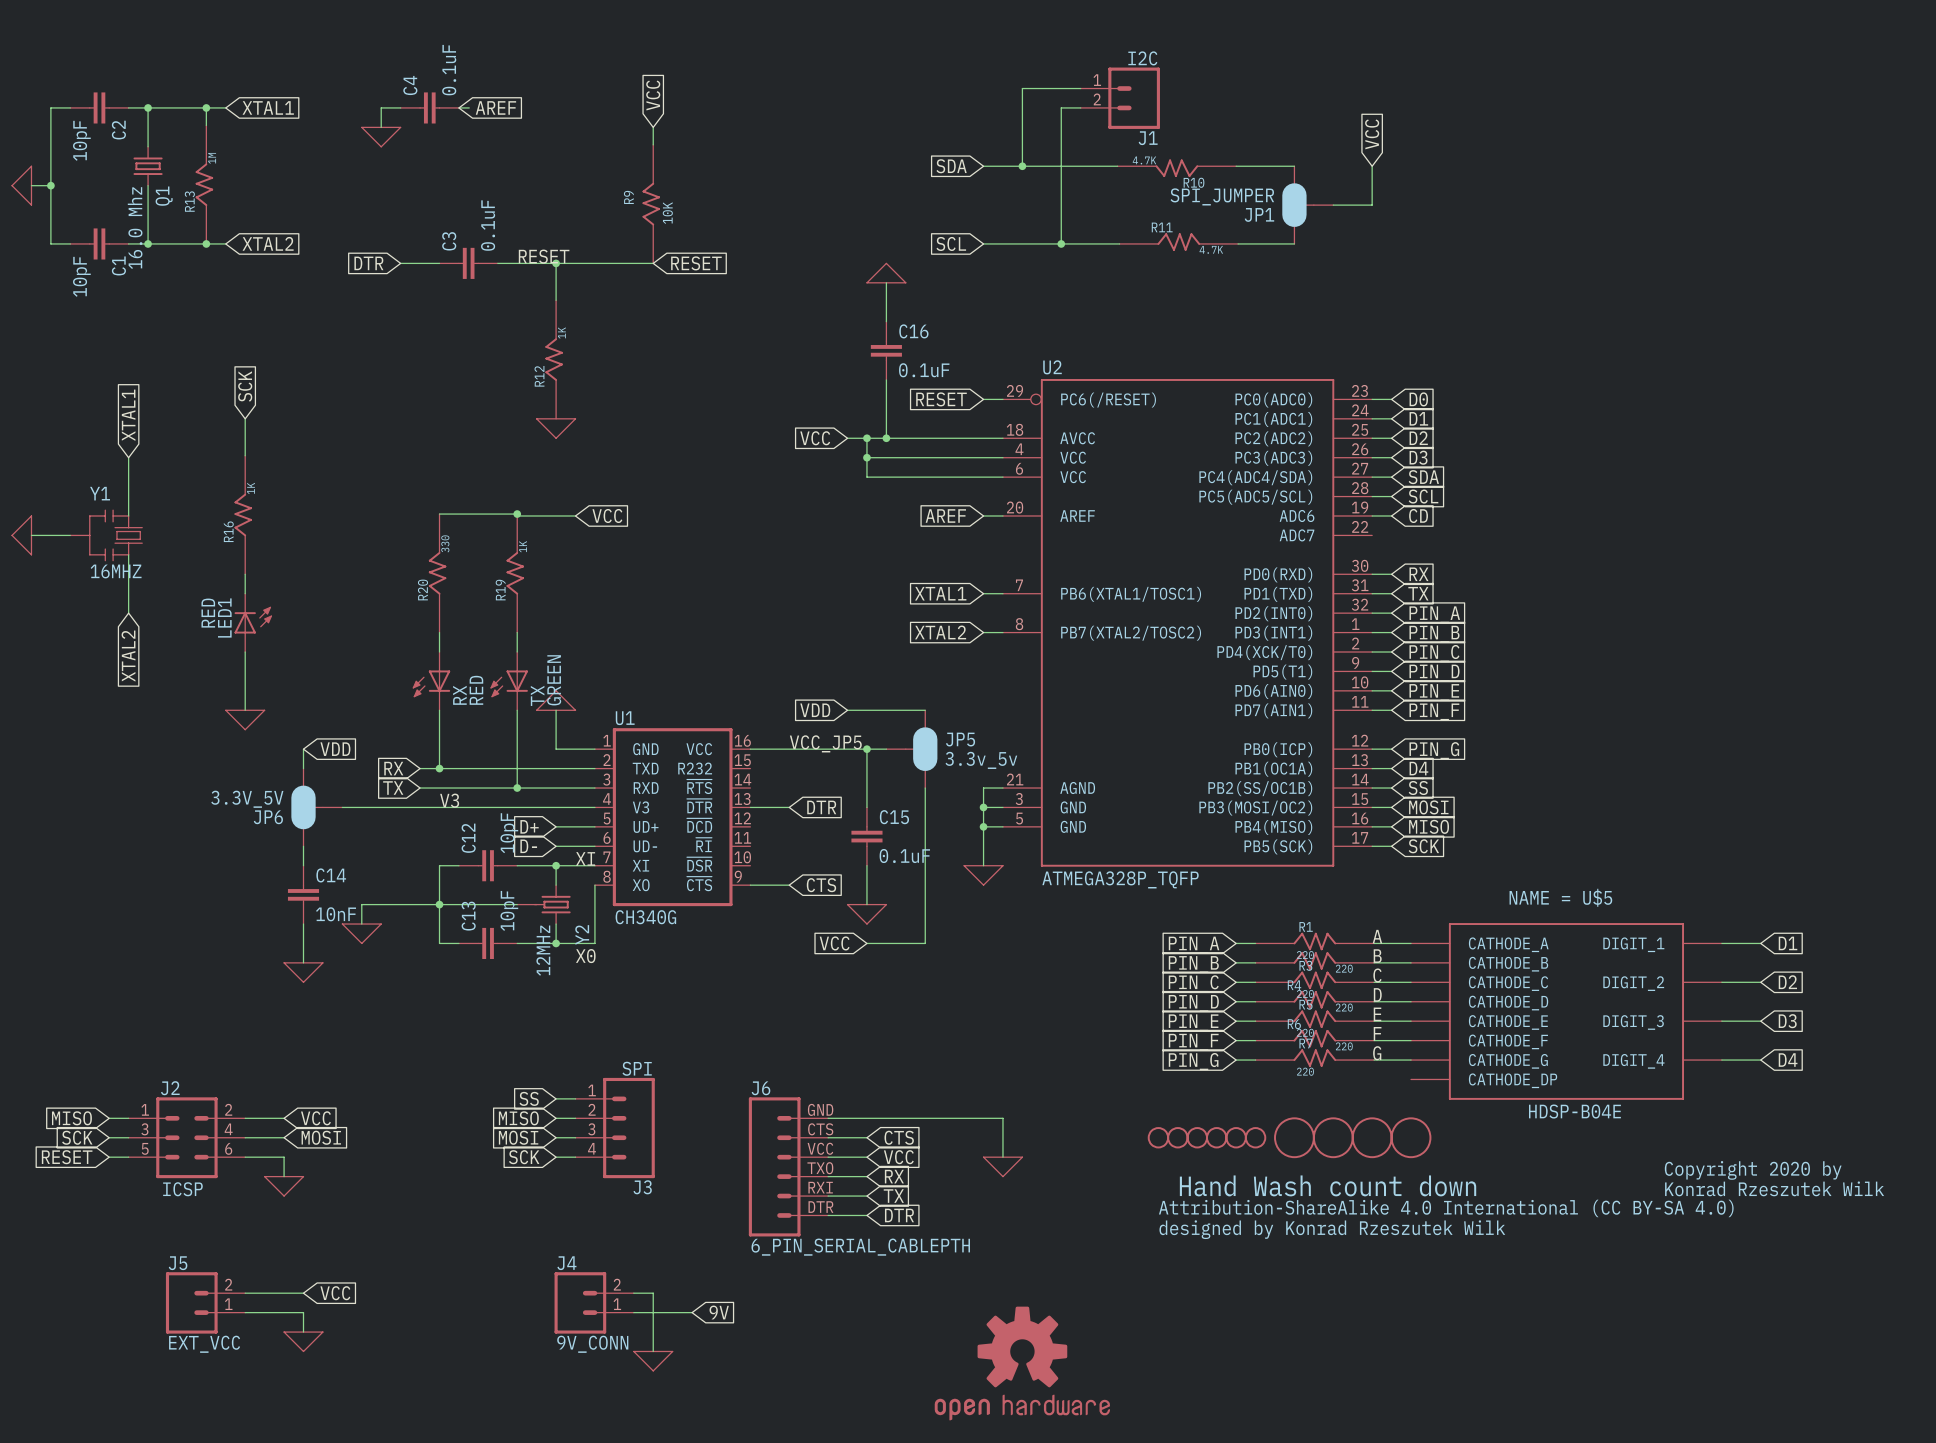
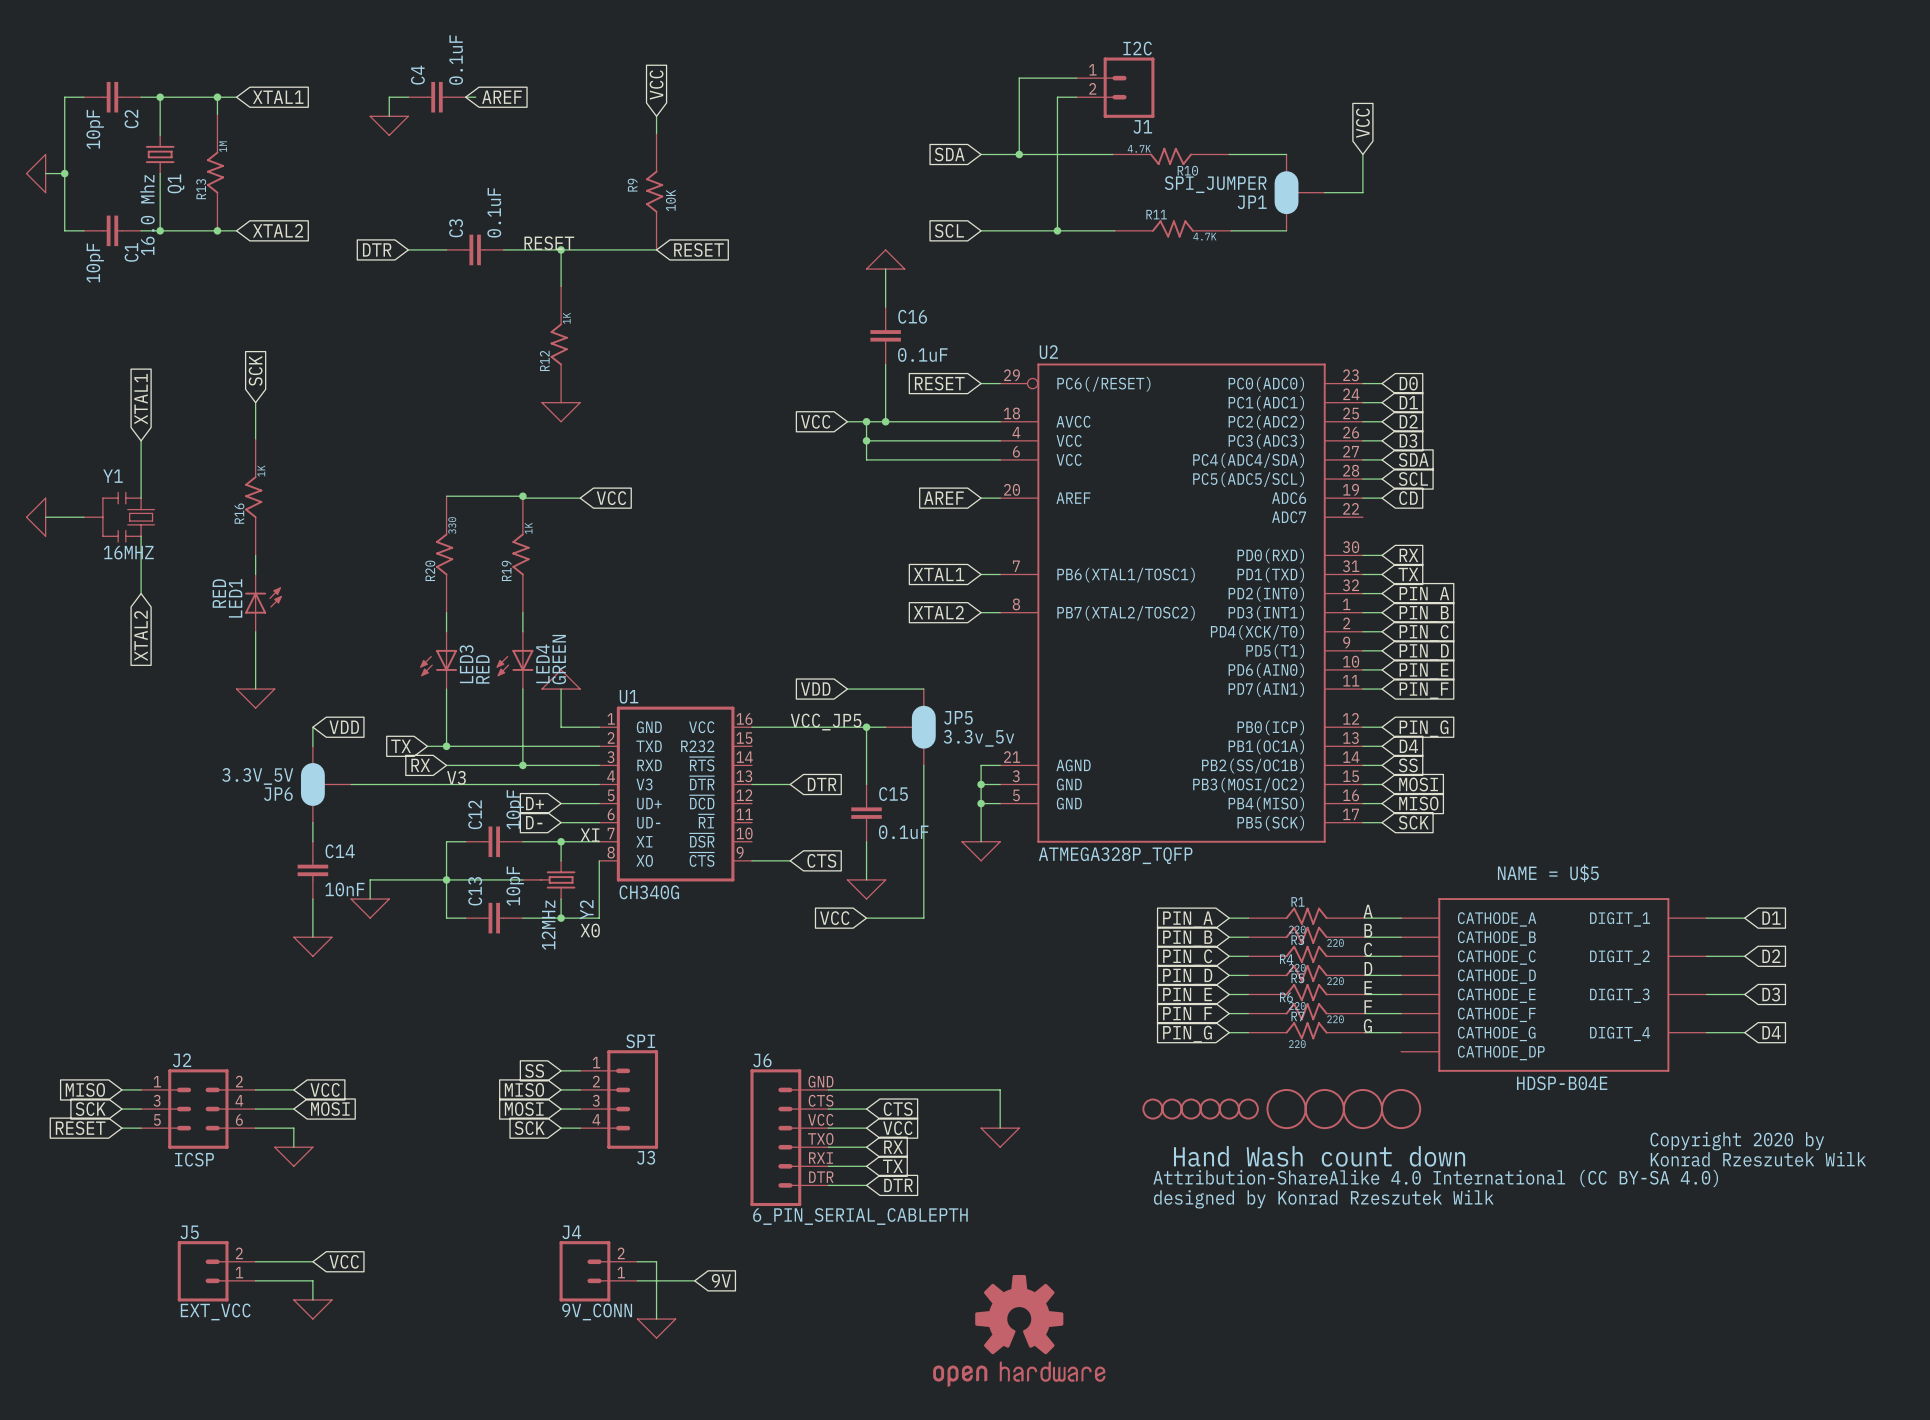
RX name: RX (459, 695) -> LED3 (466, 664)
TX name: TX (537, 695) -> LED4 (542, 663)
global label: RX (393, 768) -> TX (401, 746)
global label: TX (393, 788) -> none
global label: none -> RX (420, 765)
wire: (420, 788) (439, 788) -> none

